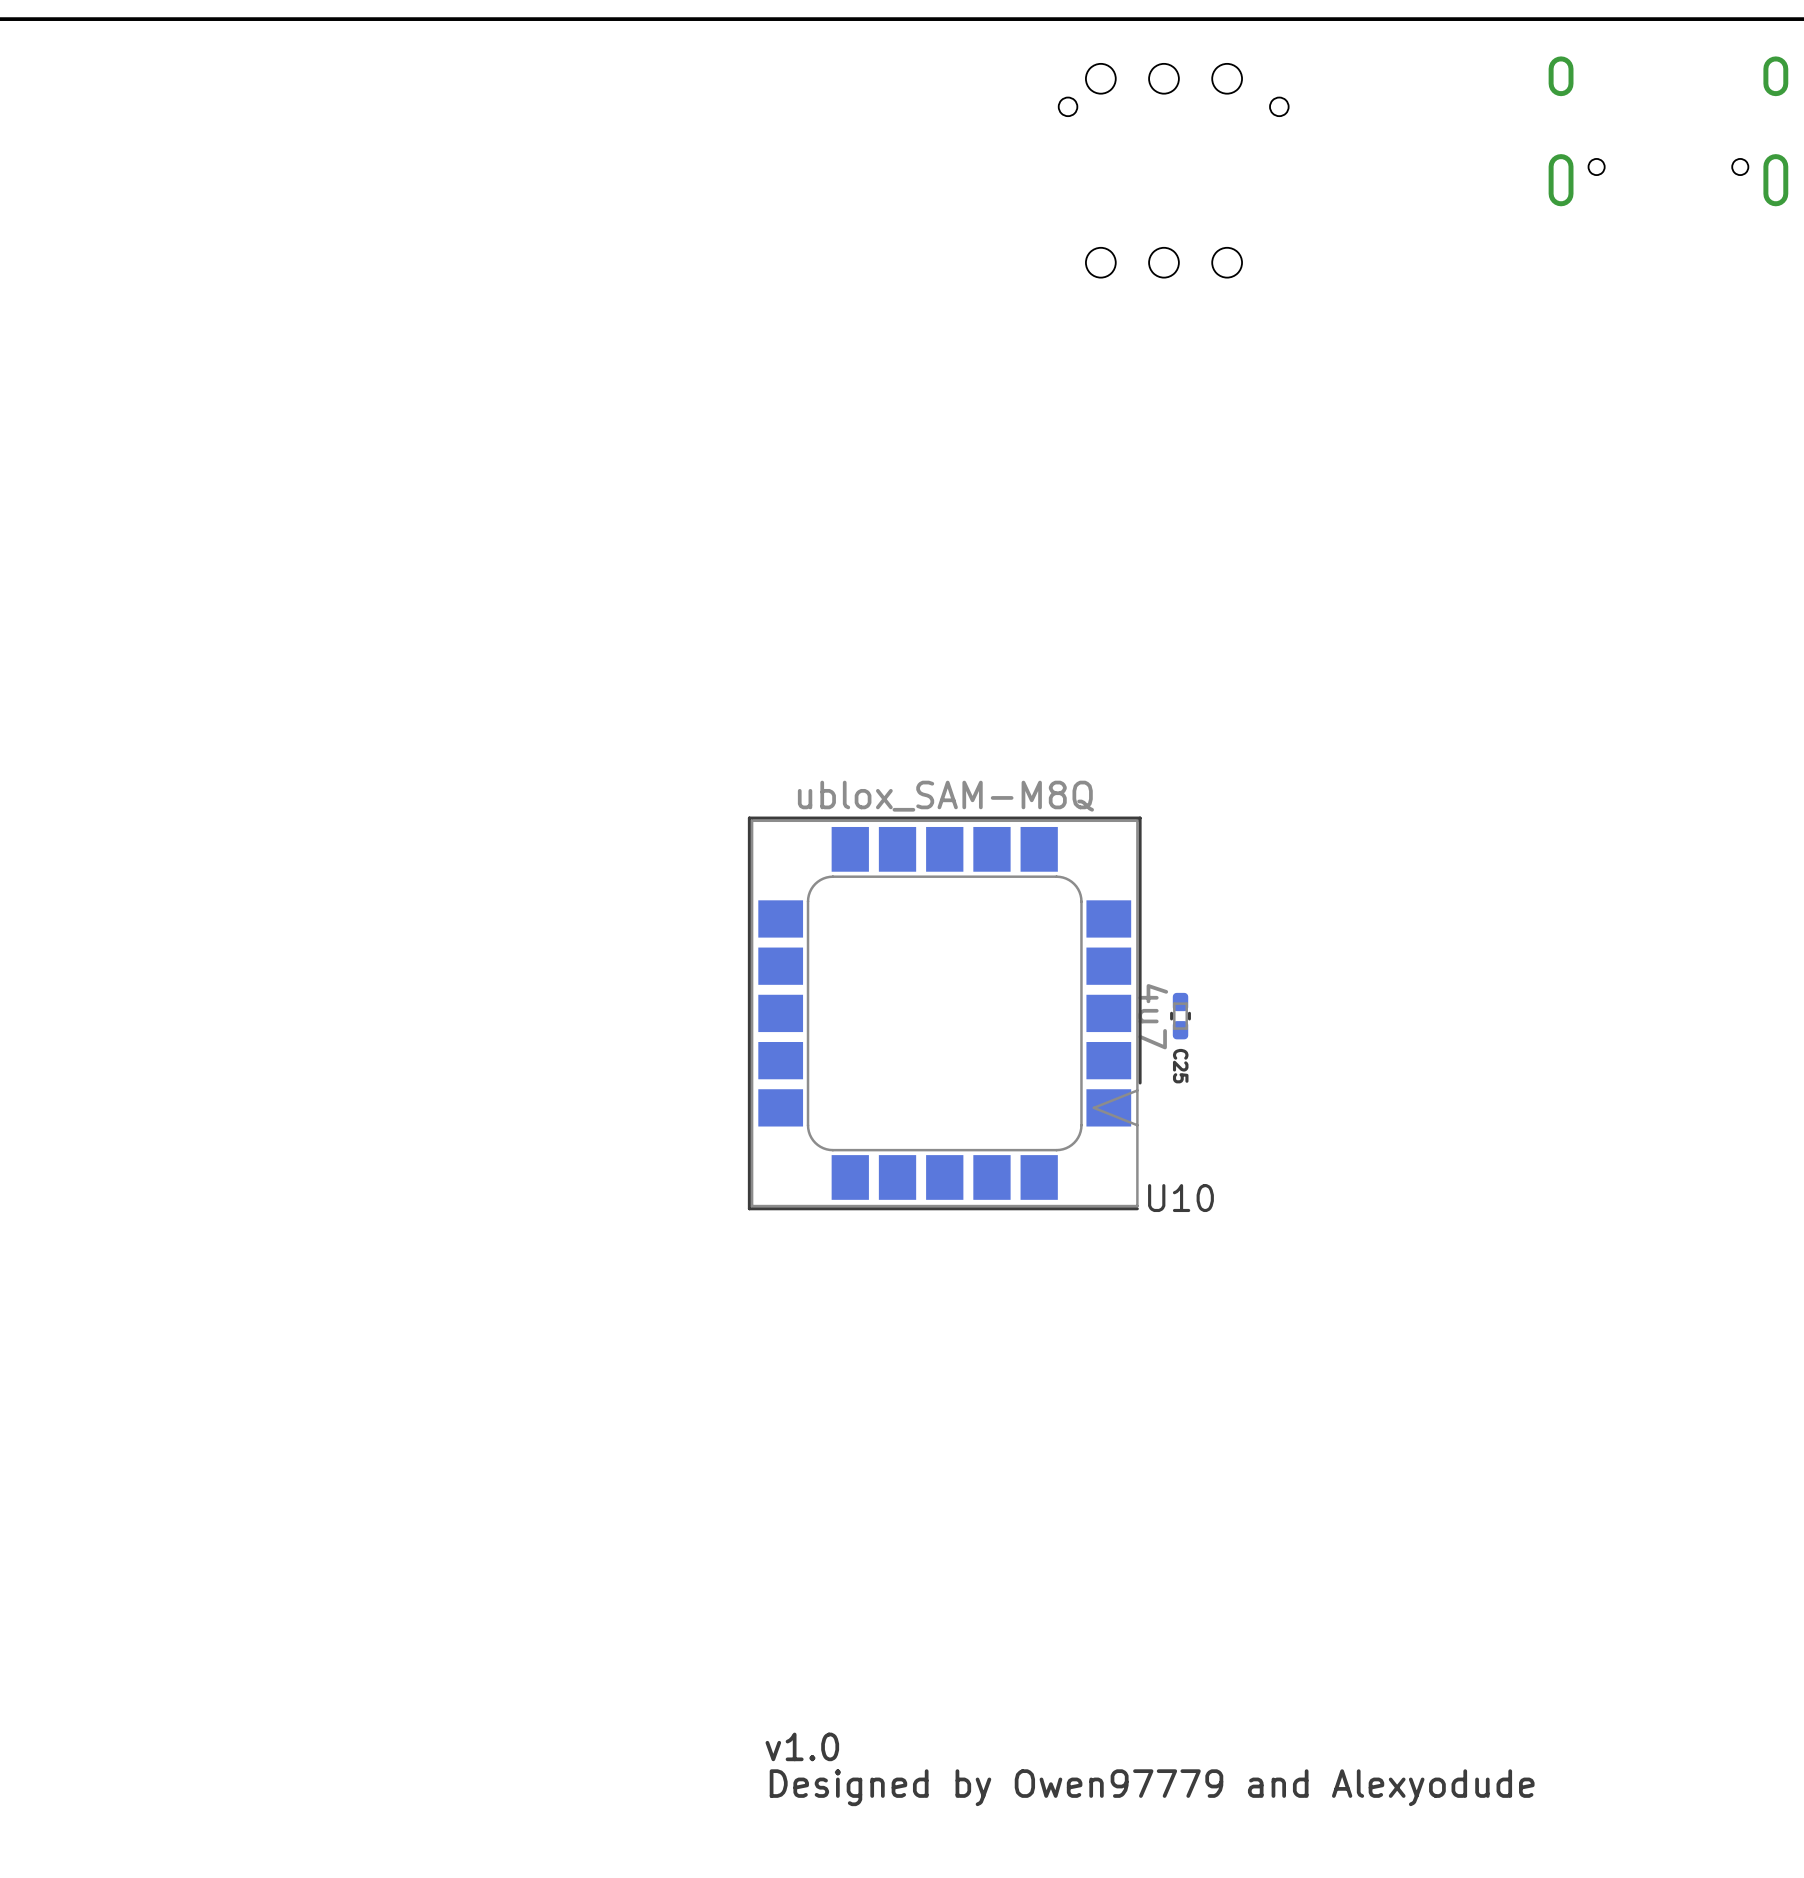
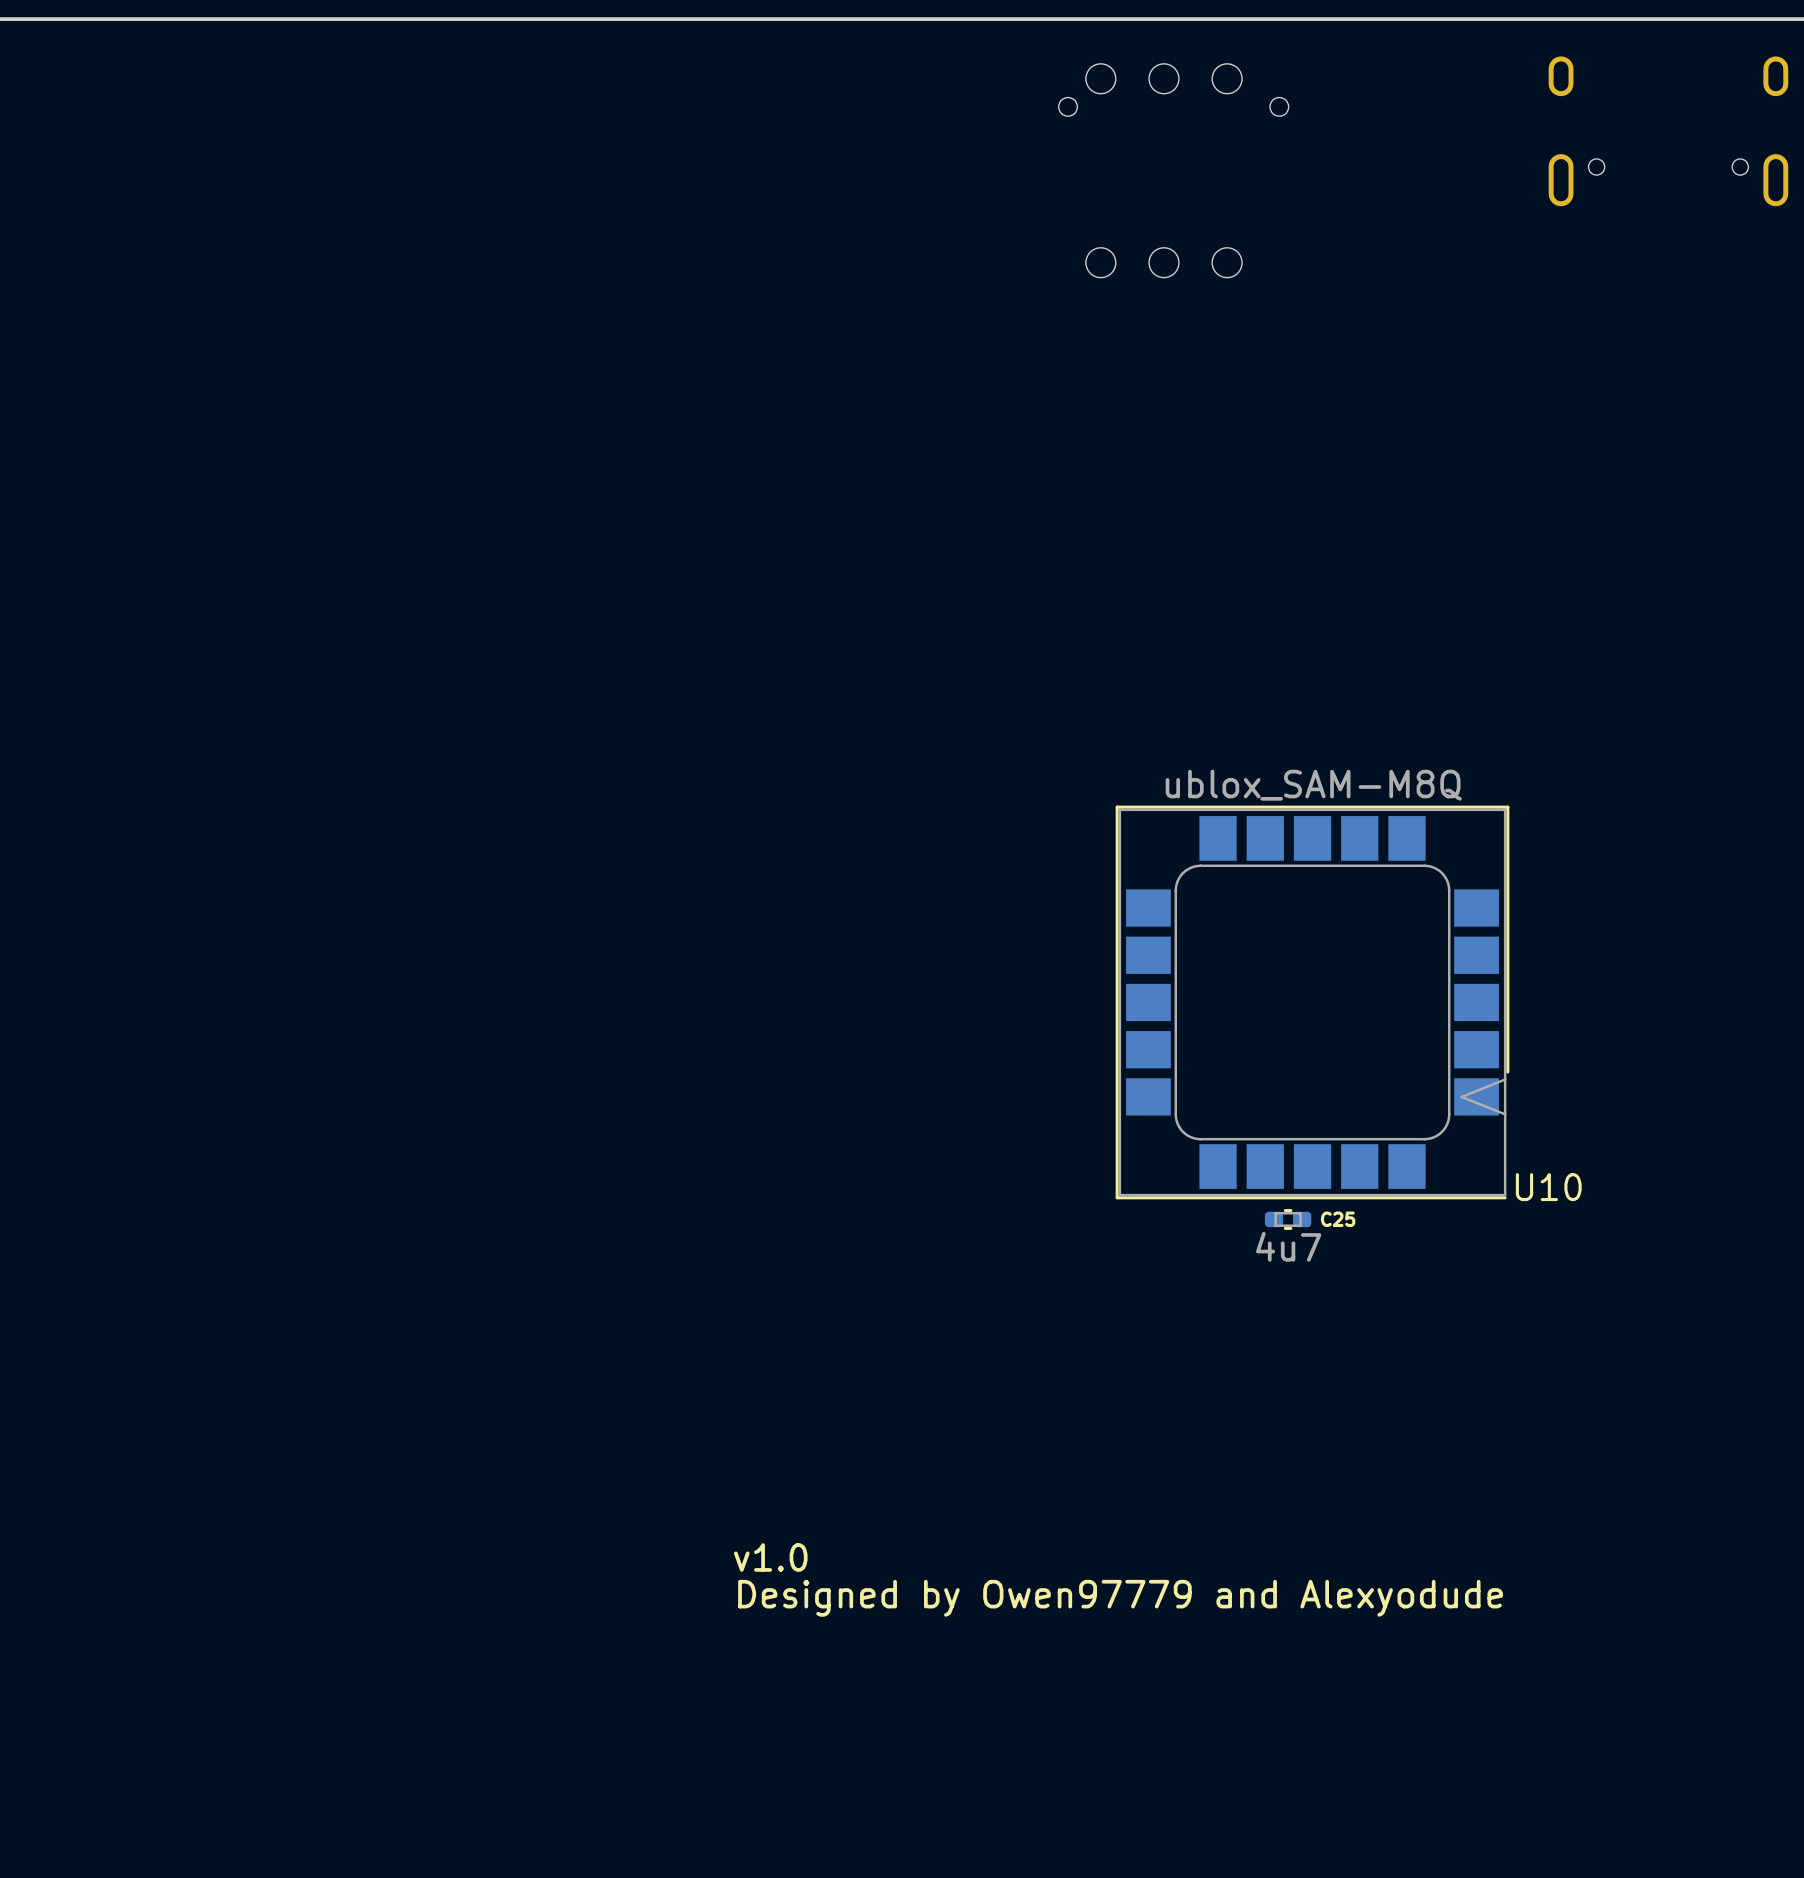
U10 position: (944, 1013) -> (1312, 1002)
C25 rotation: 0° (1180, 1016) -> 90° clockwise (1288, 1219)
C25 position: (1180, 1016) -> (1288, 1219)
C25 name position: C25 (1180, 1066) -> C25 (1338, 1219)
text position: v1.0 (802, 1746) -> v1.0 (770, 1557)
text position: Designed by Owen97779 and Alexyodude (1152, 1787) -> Designed by Owen97779 and Alexyodude (1120, 1598)

